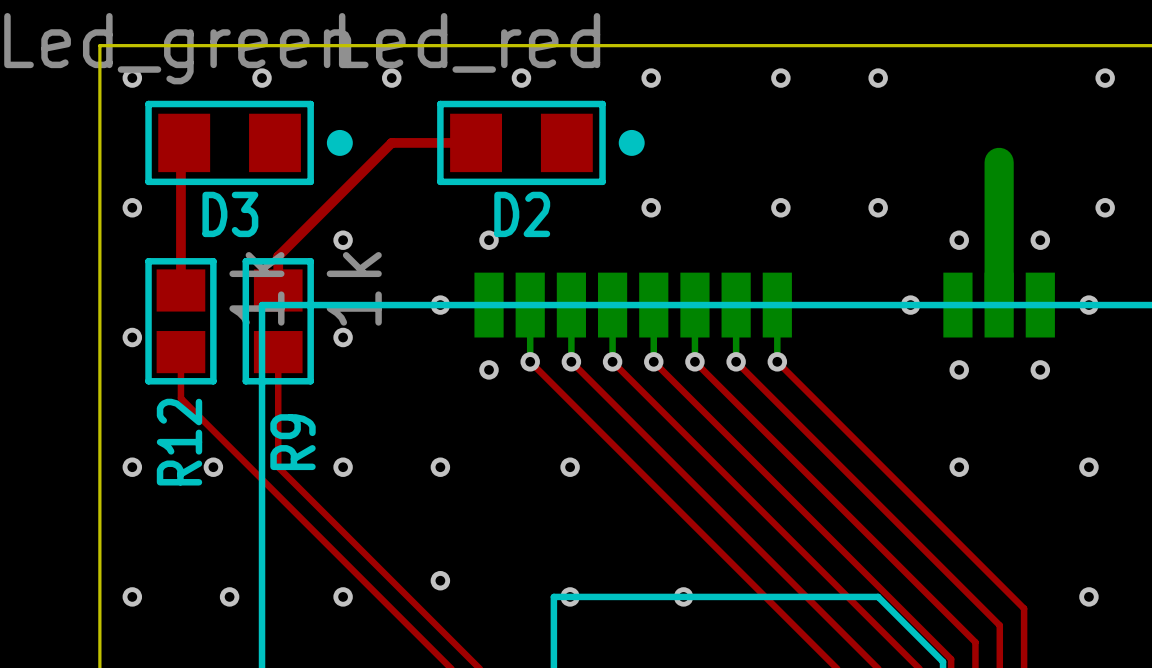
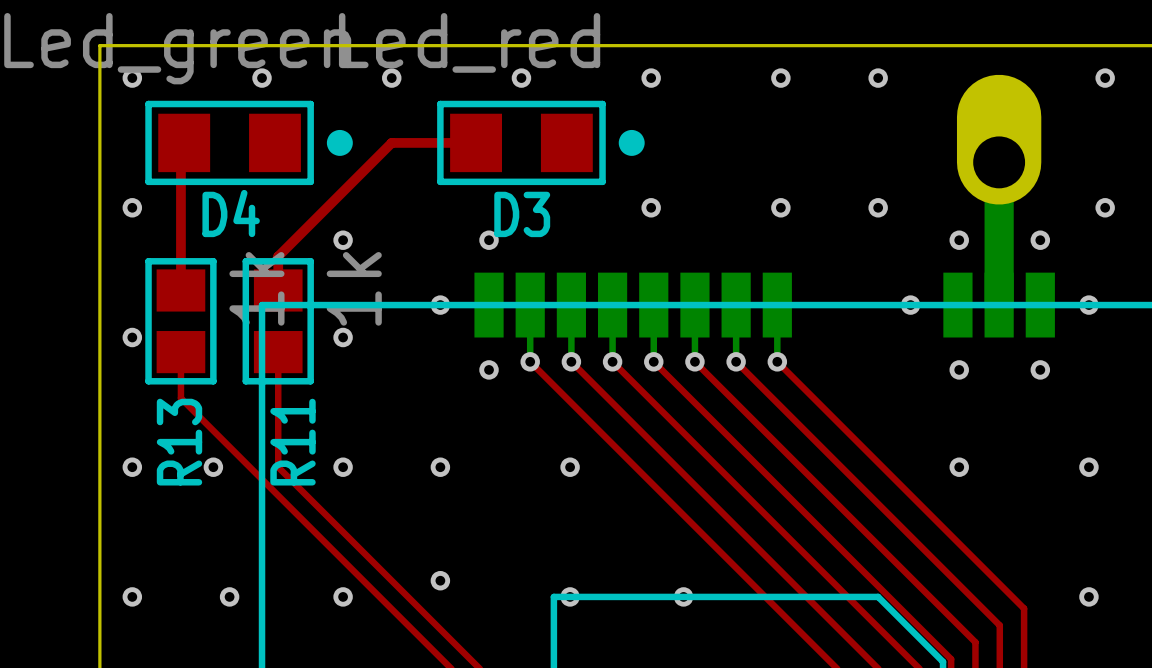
part: none -> (999, 139)
D3 name: D3 (230, 214) -> D4 (231, 213)
D2 name: D2 (522, 214) -> D3 (522, 214)
R12 name: R12 (179, 442) -> R13 (179, 442)
R9 name: R9 (293, 442) -> R11 (293, 442)

